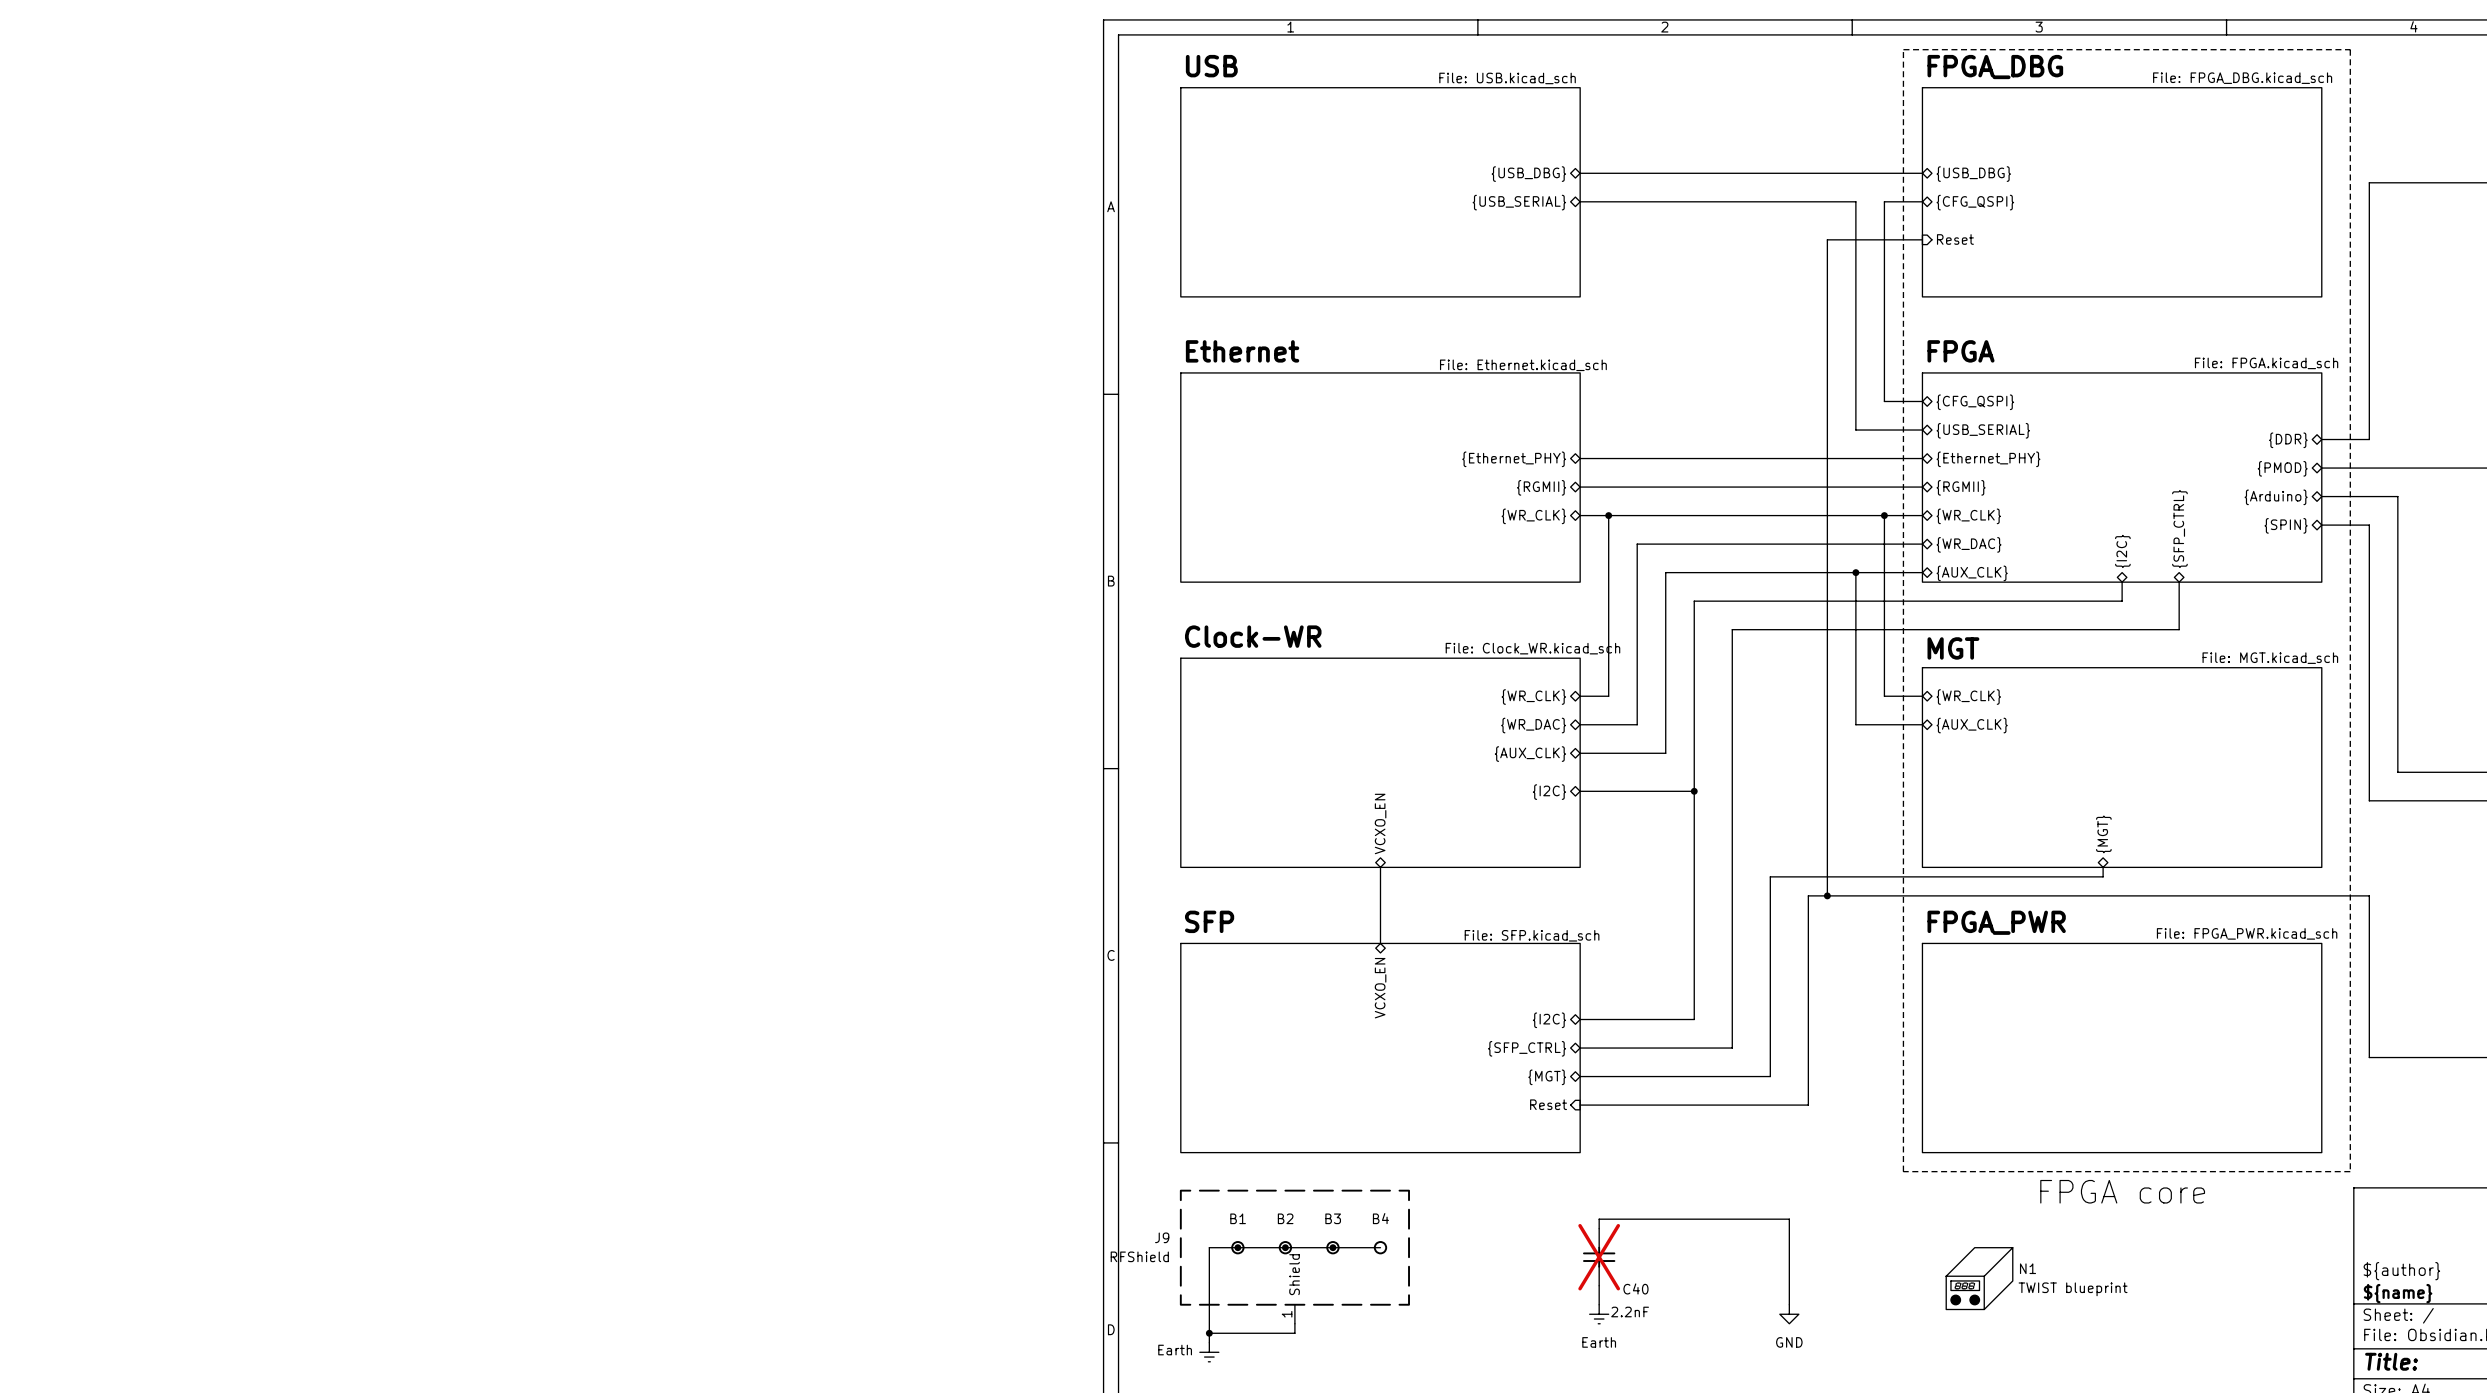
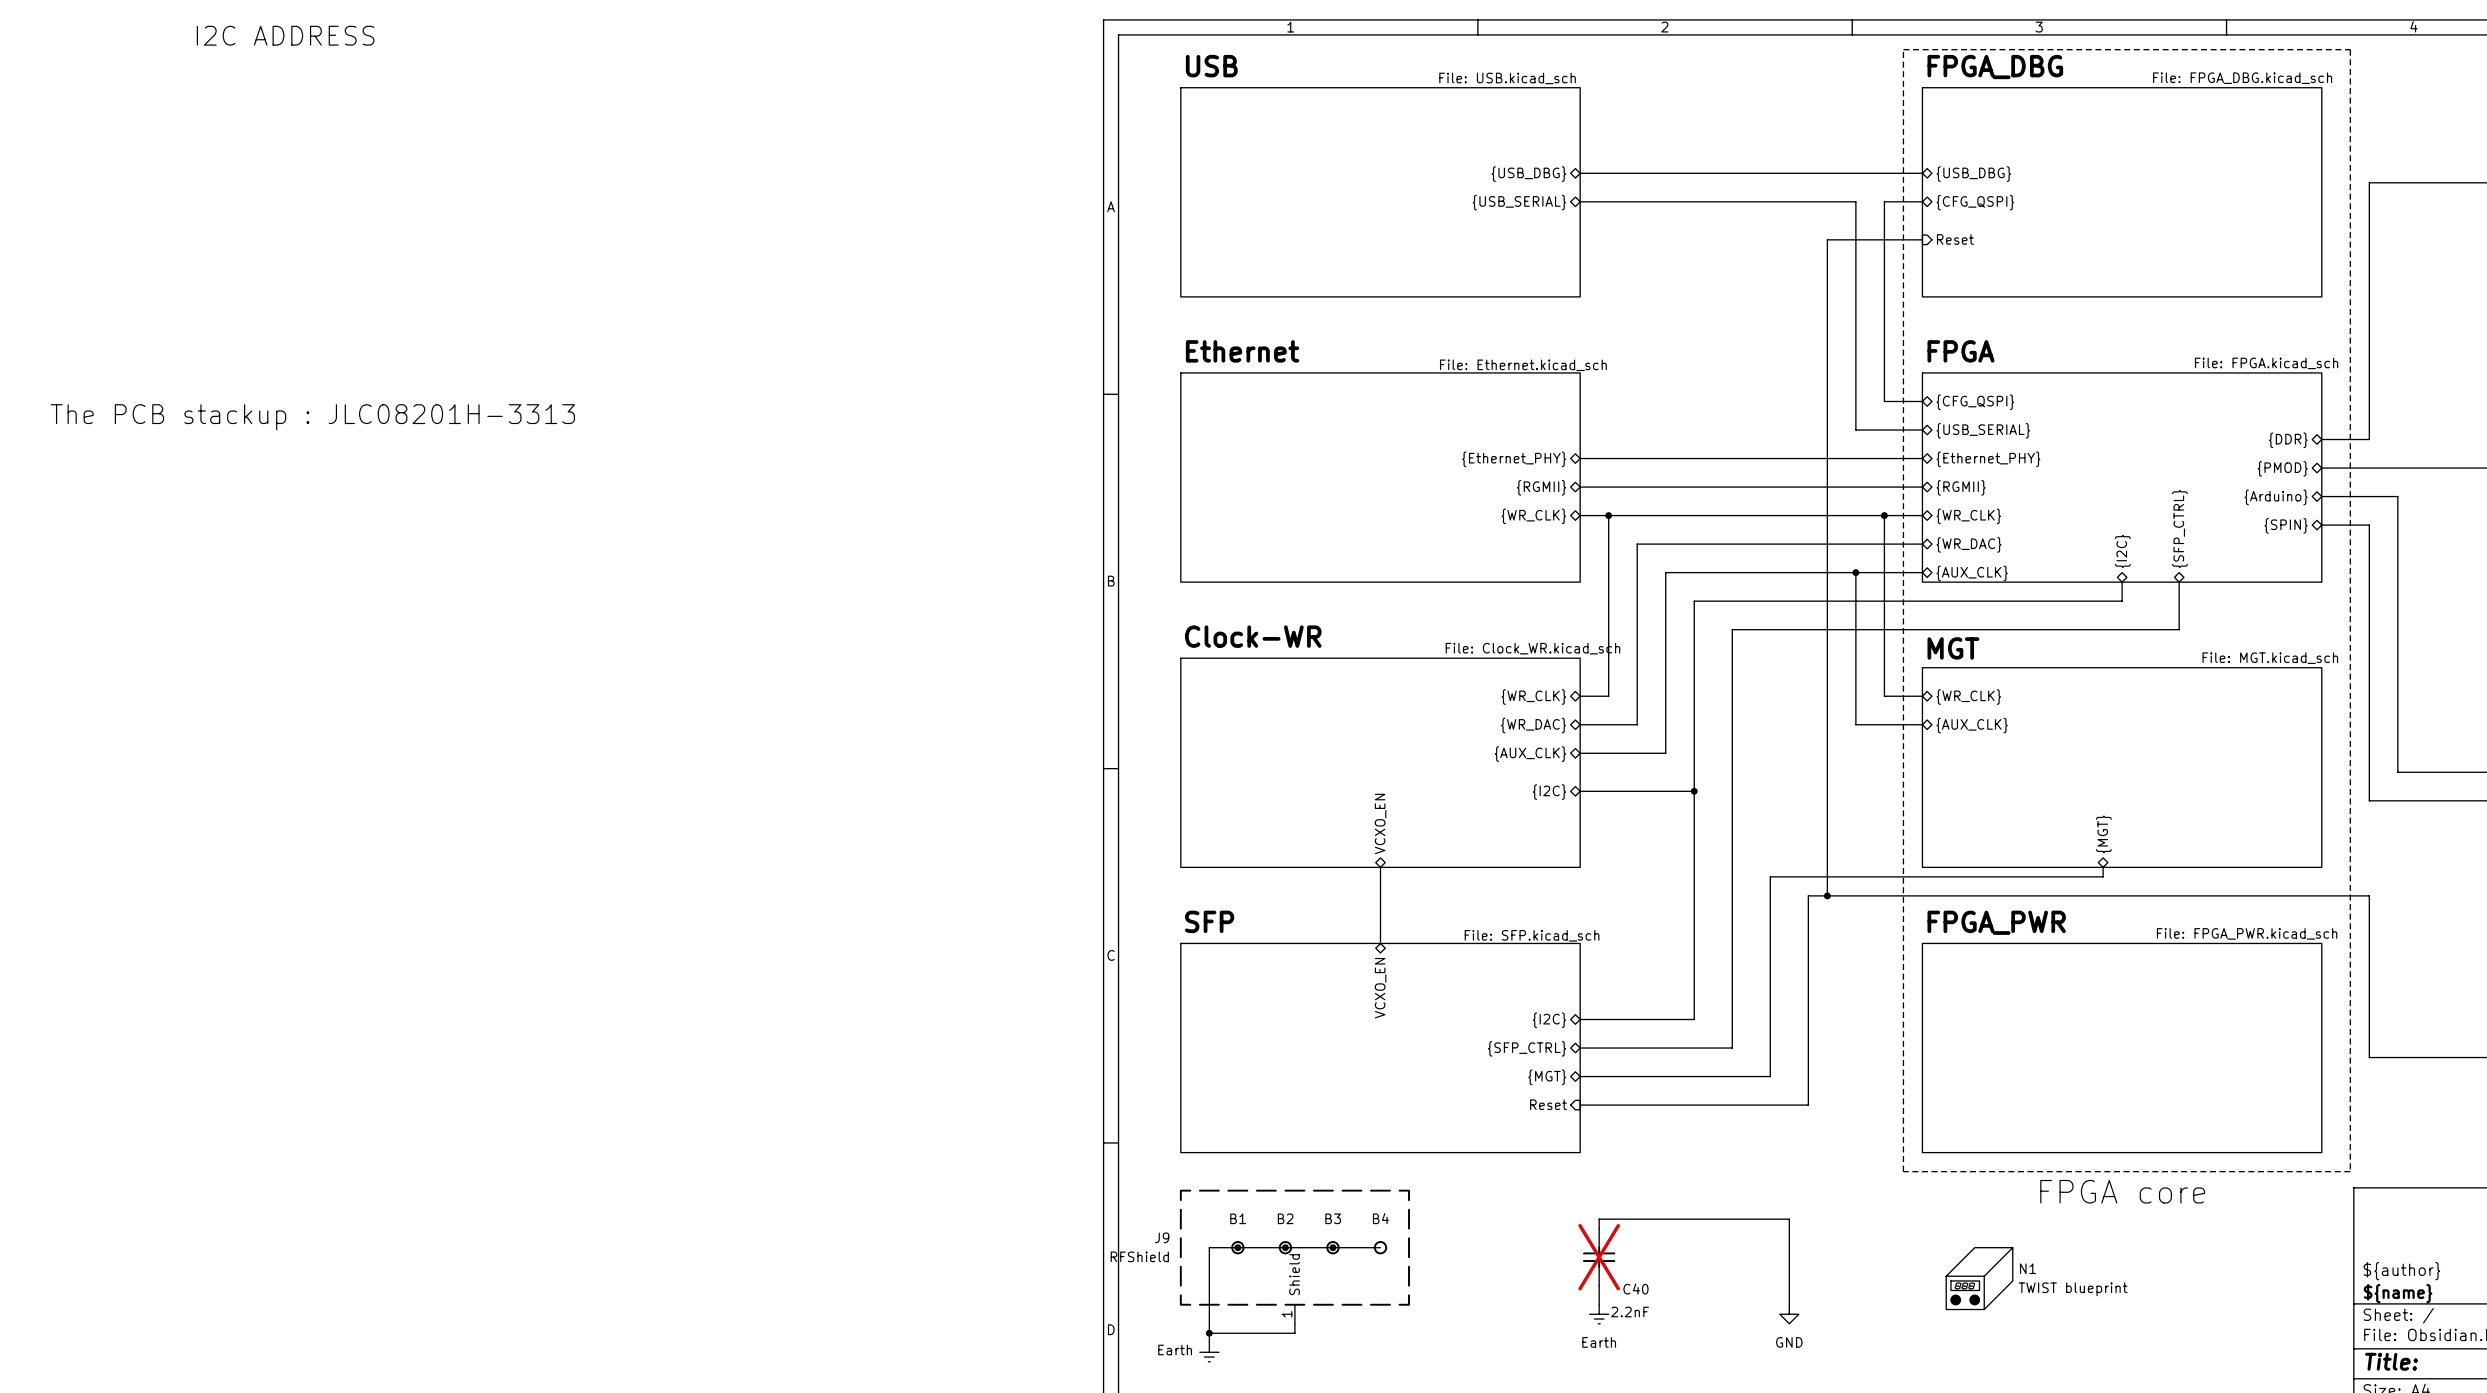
text: none -> I2C ADDRESS (285, 35)
text: none -> The PCB stackup : JLC08201H-3313 (312, 417)

